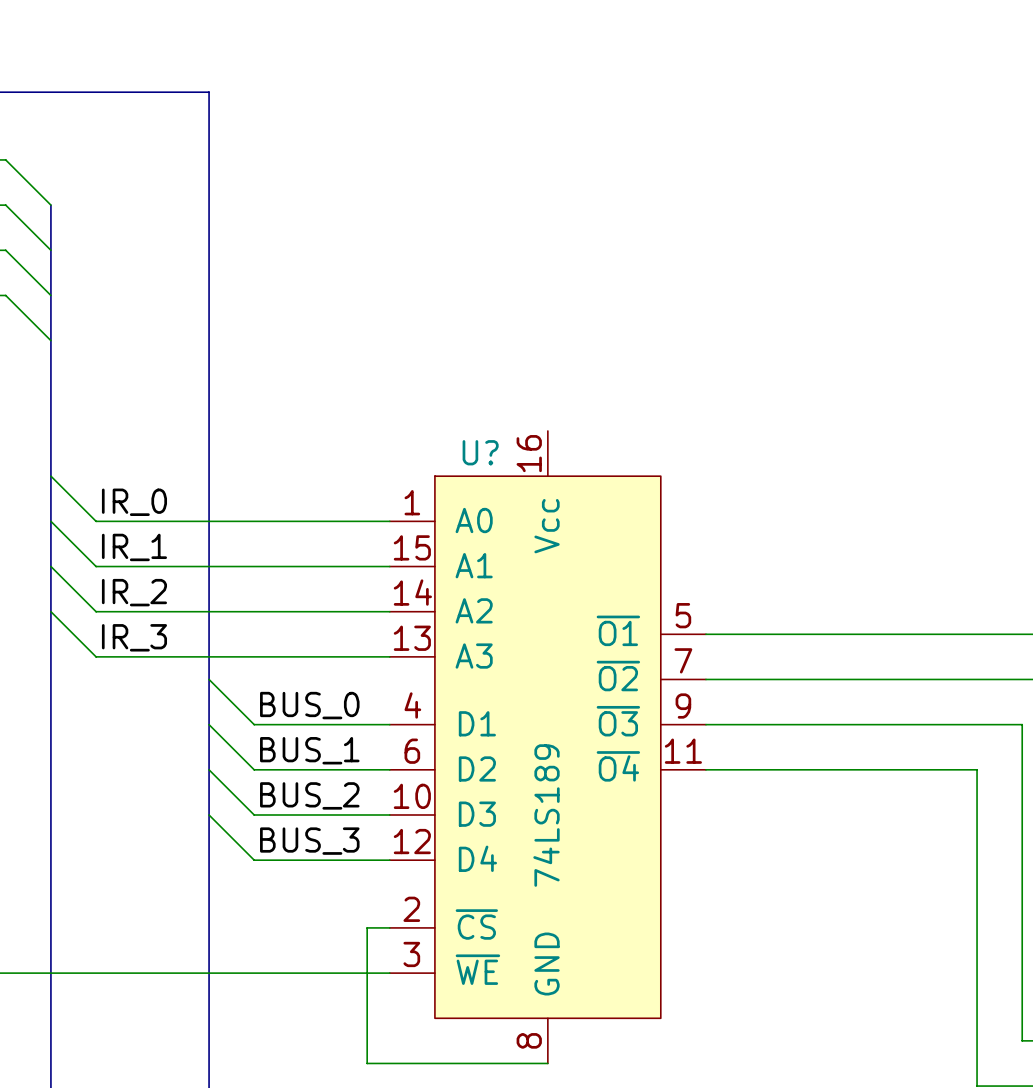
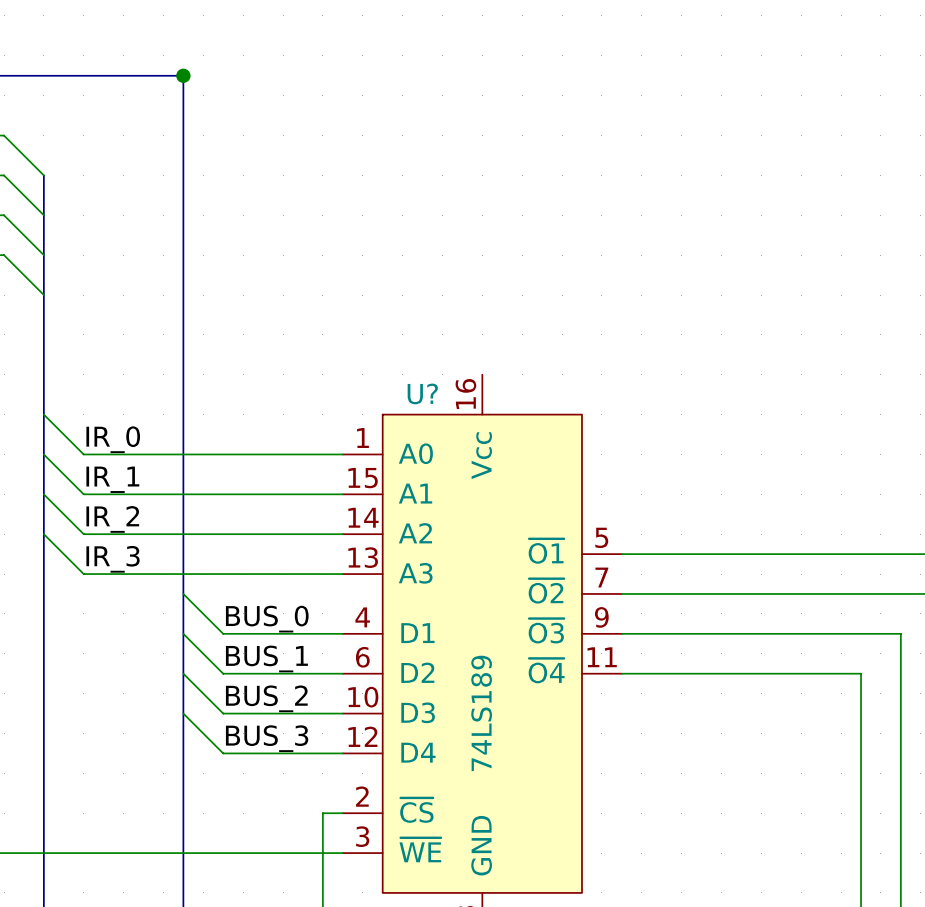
junction: none -> (183, 75)

